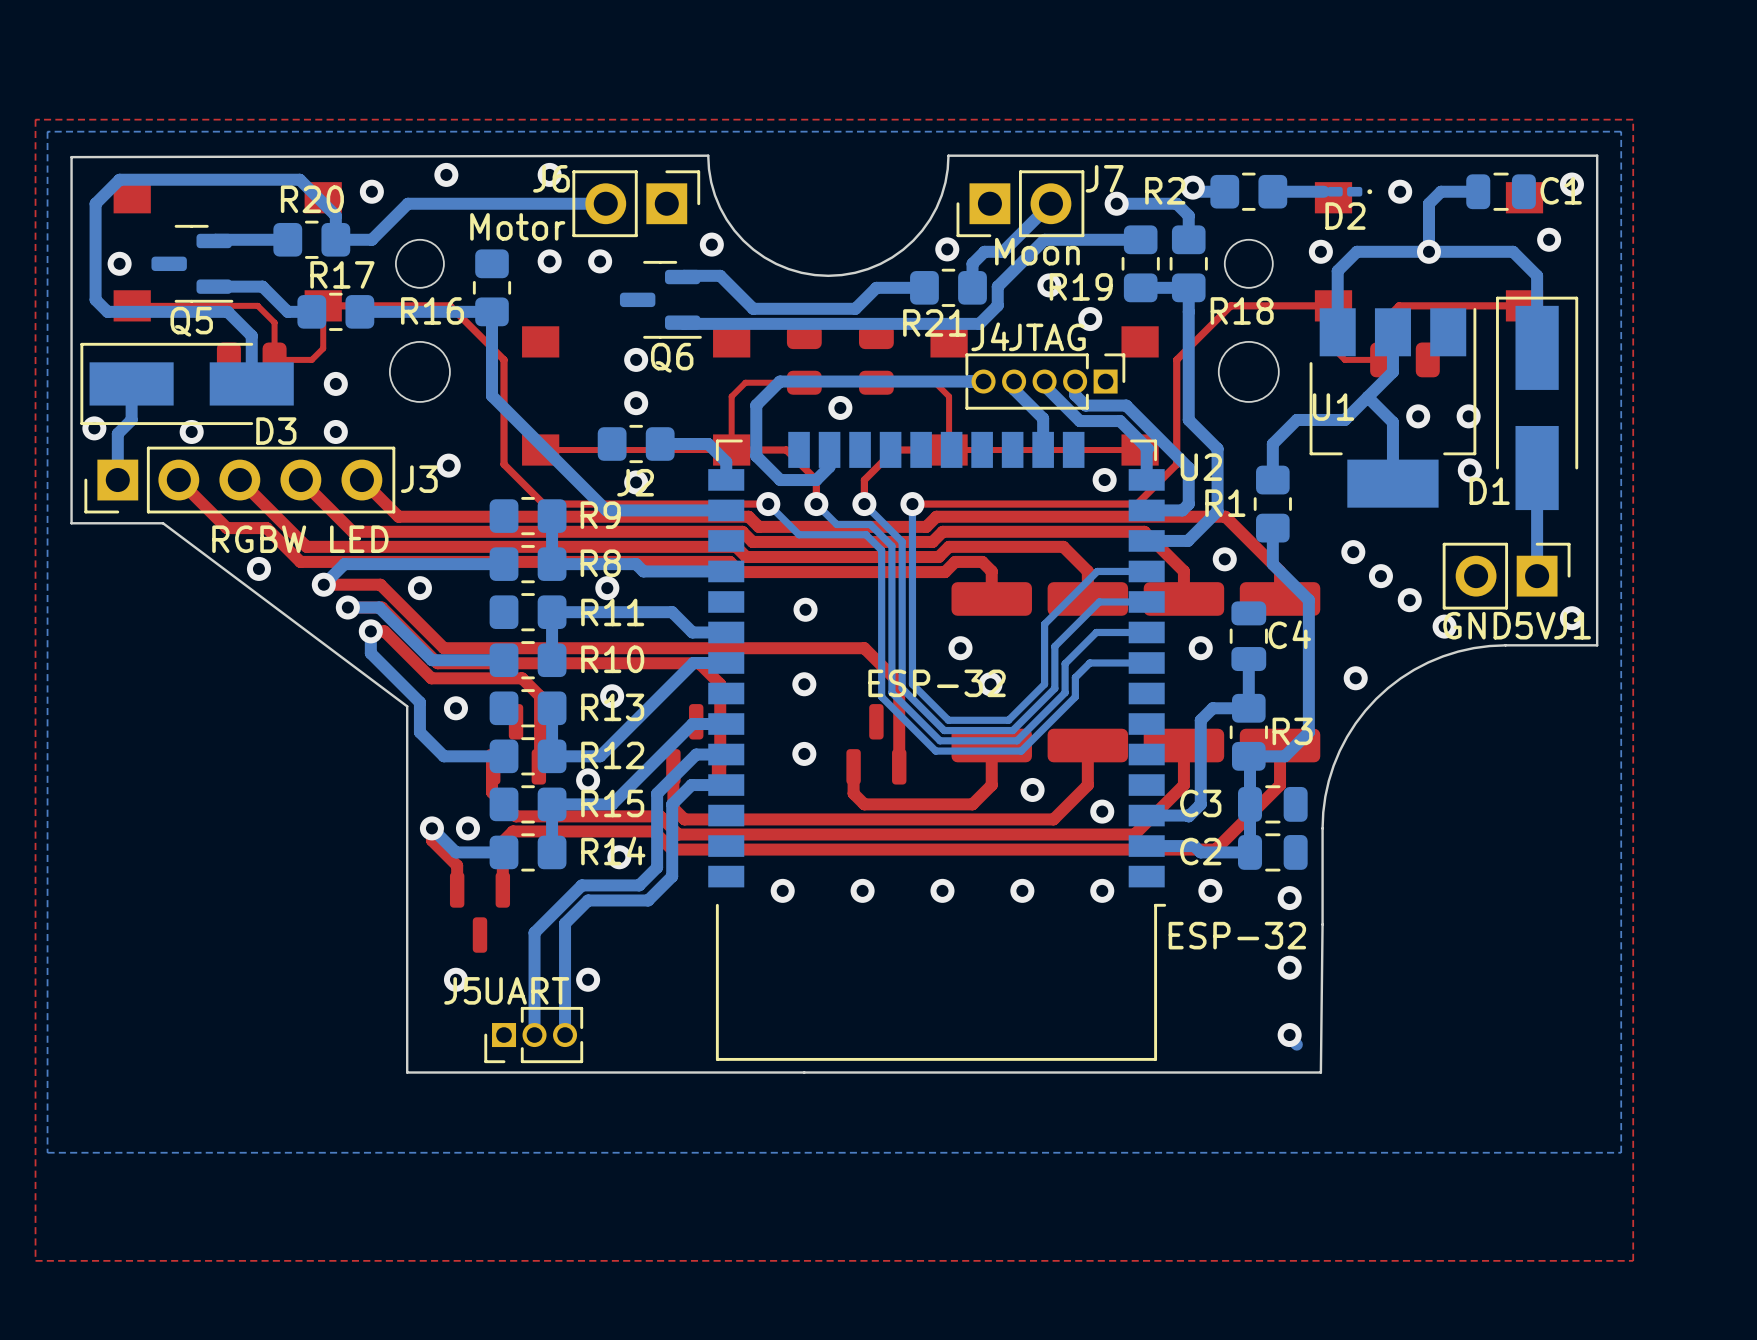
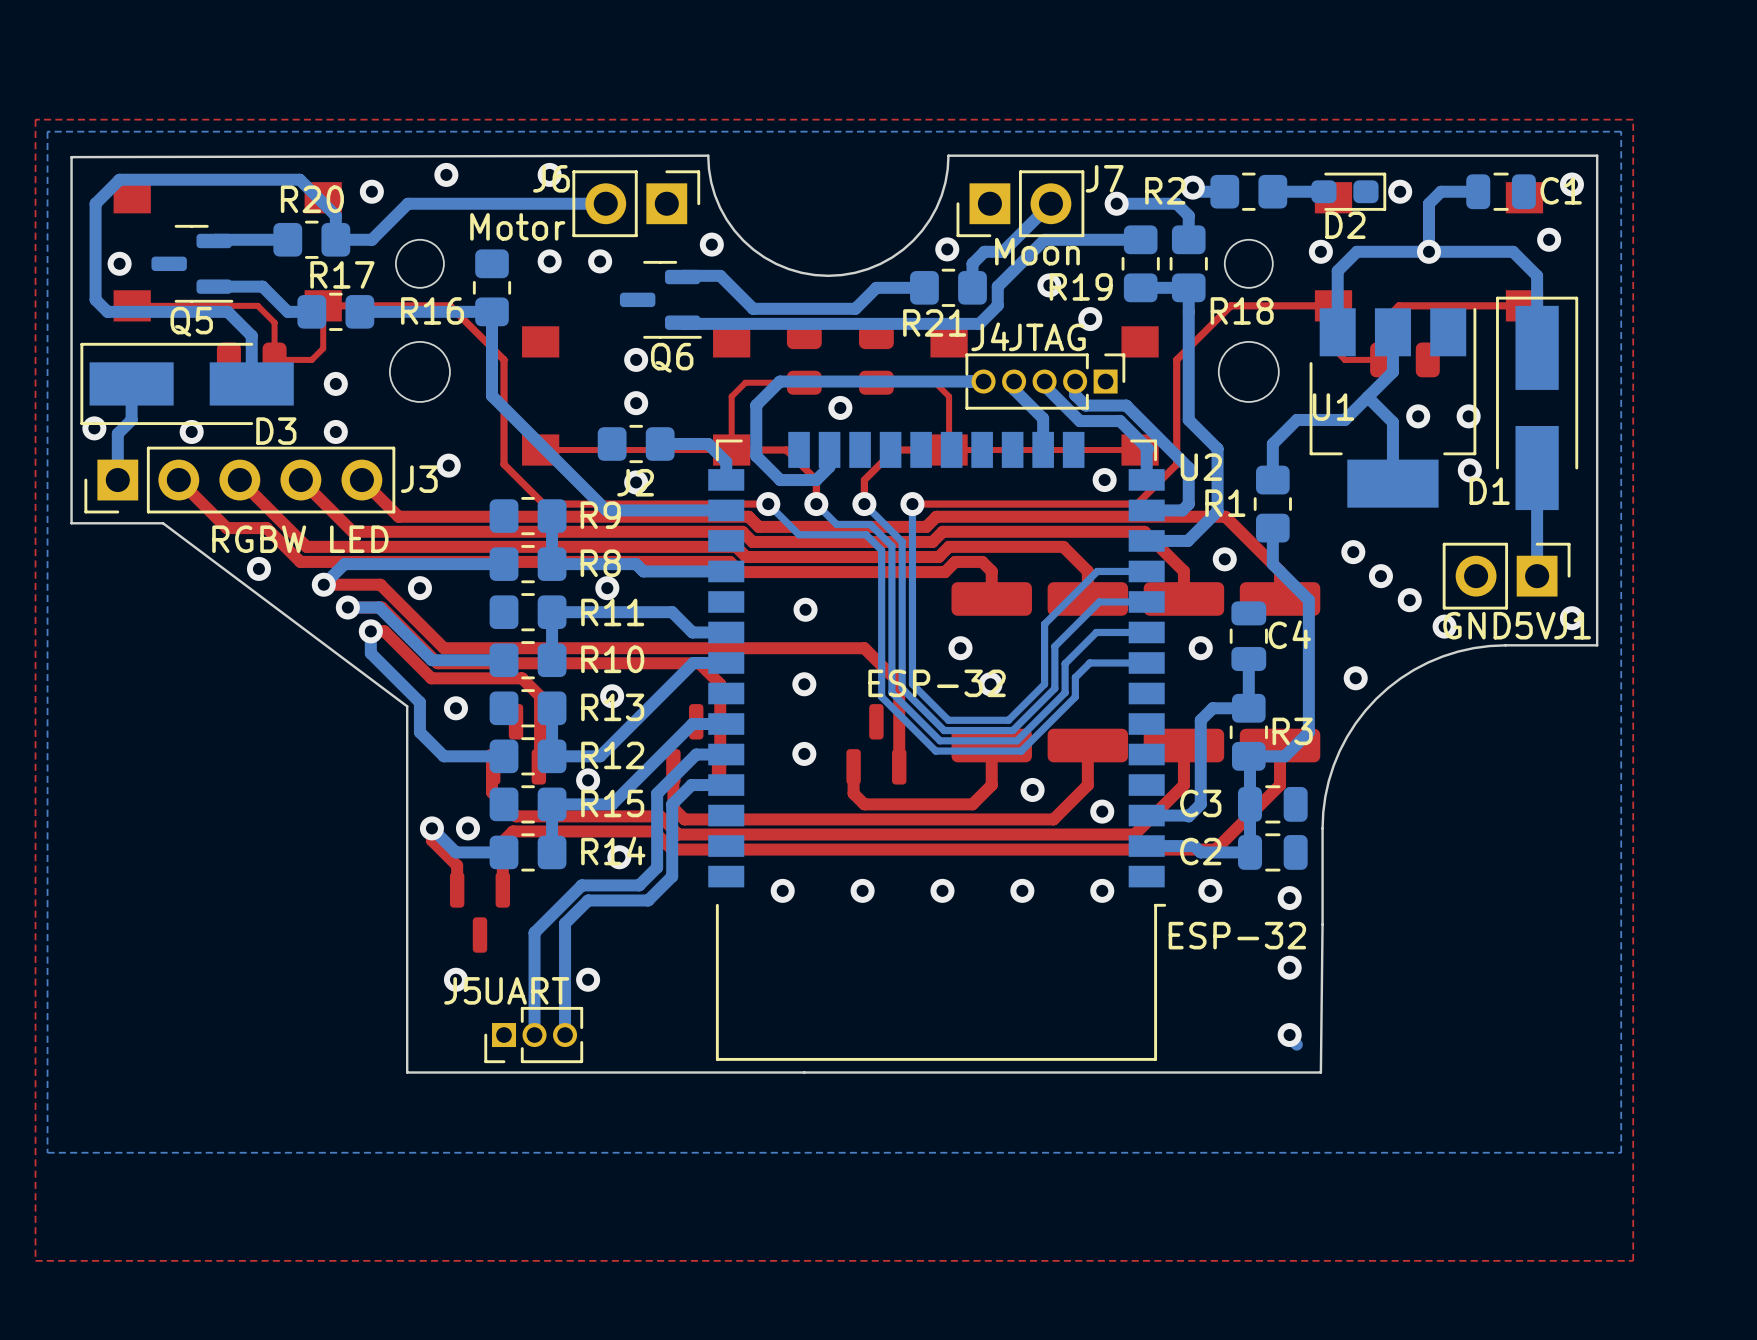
D2 footprint: [1327, 186, 1373, 197] -> [1311, 172, 1387, 211]

